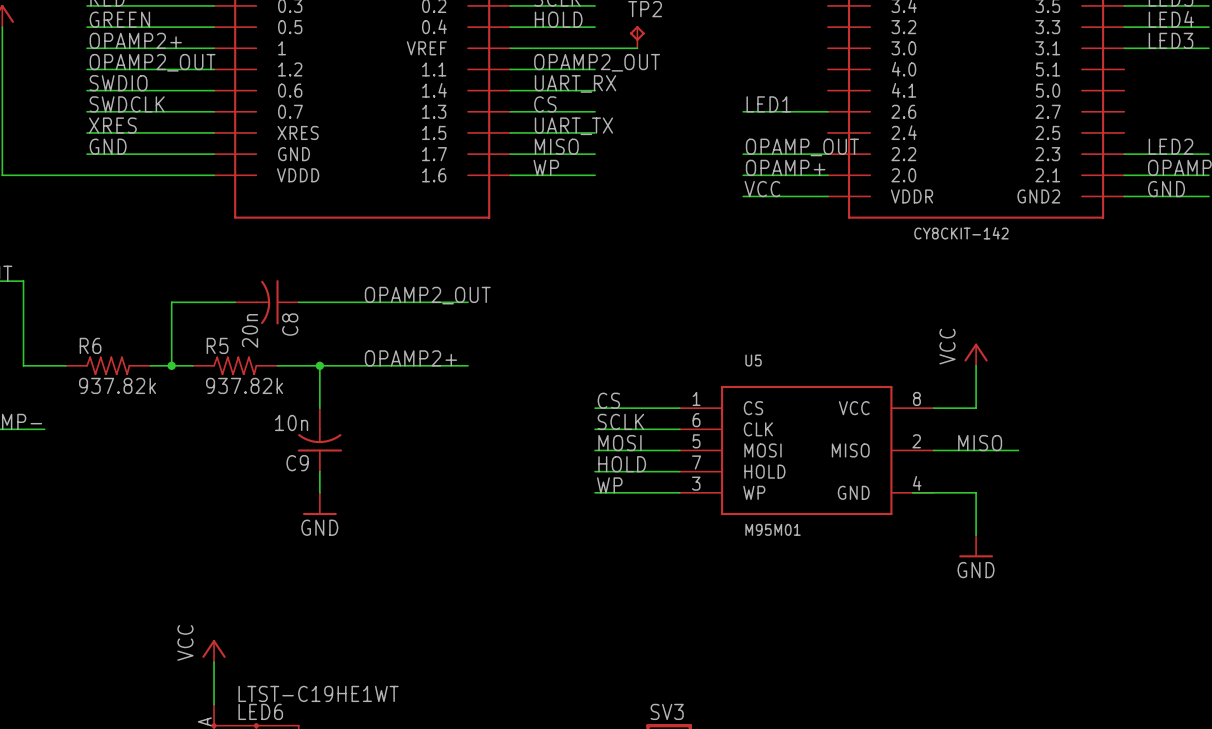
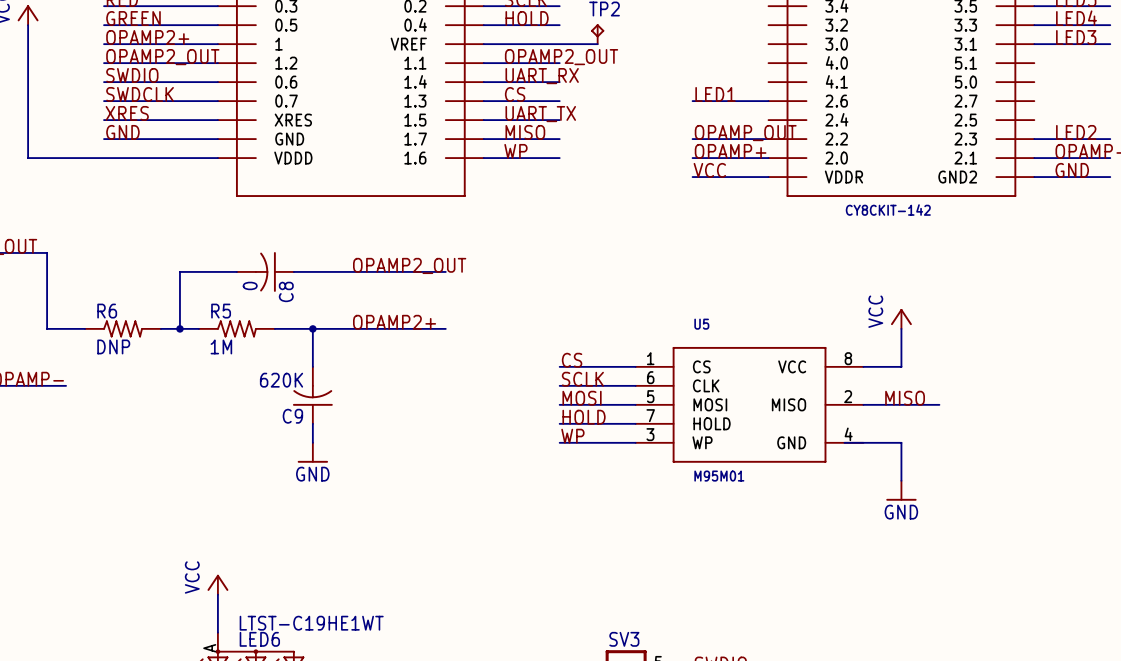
C8 value: 20n (250, 330) -> 0 (250, 285)
R6 value: 937.82k (117, 385) -> DNP (113, 346)
R5 value: 937.82k (244, 385) -> 1M (221, 346)
C9 value: 10n (291, 422) -> 620K (281, 380)

